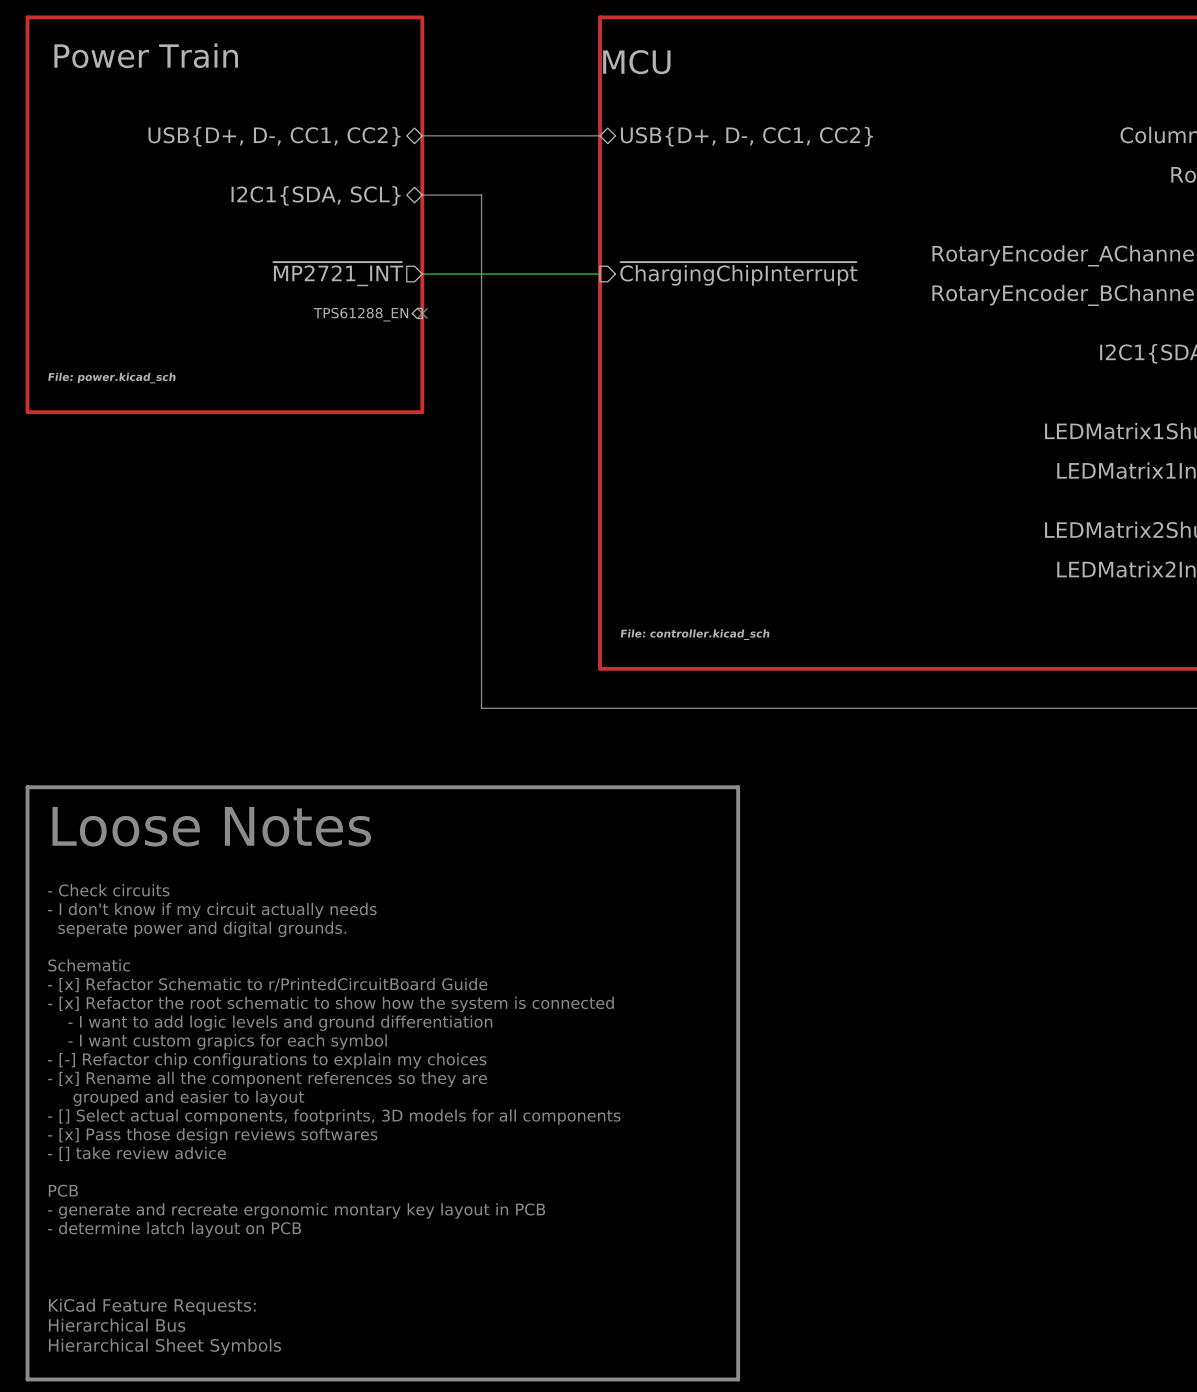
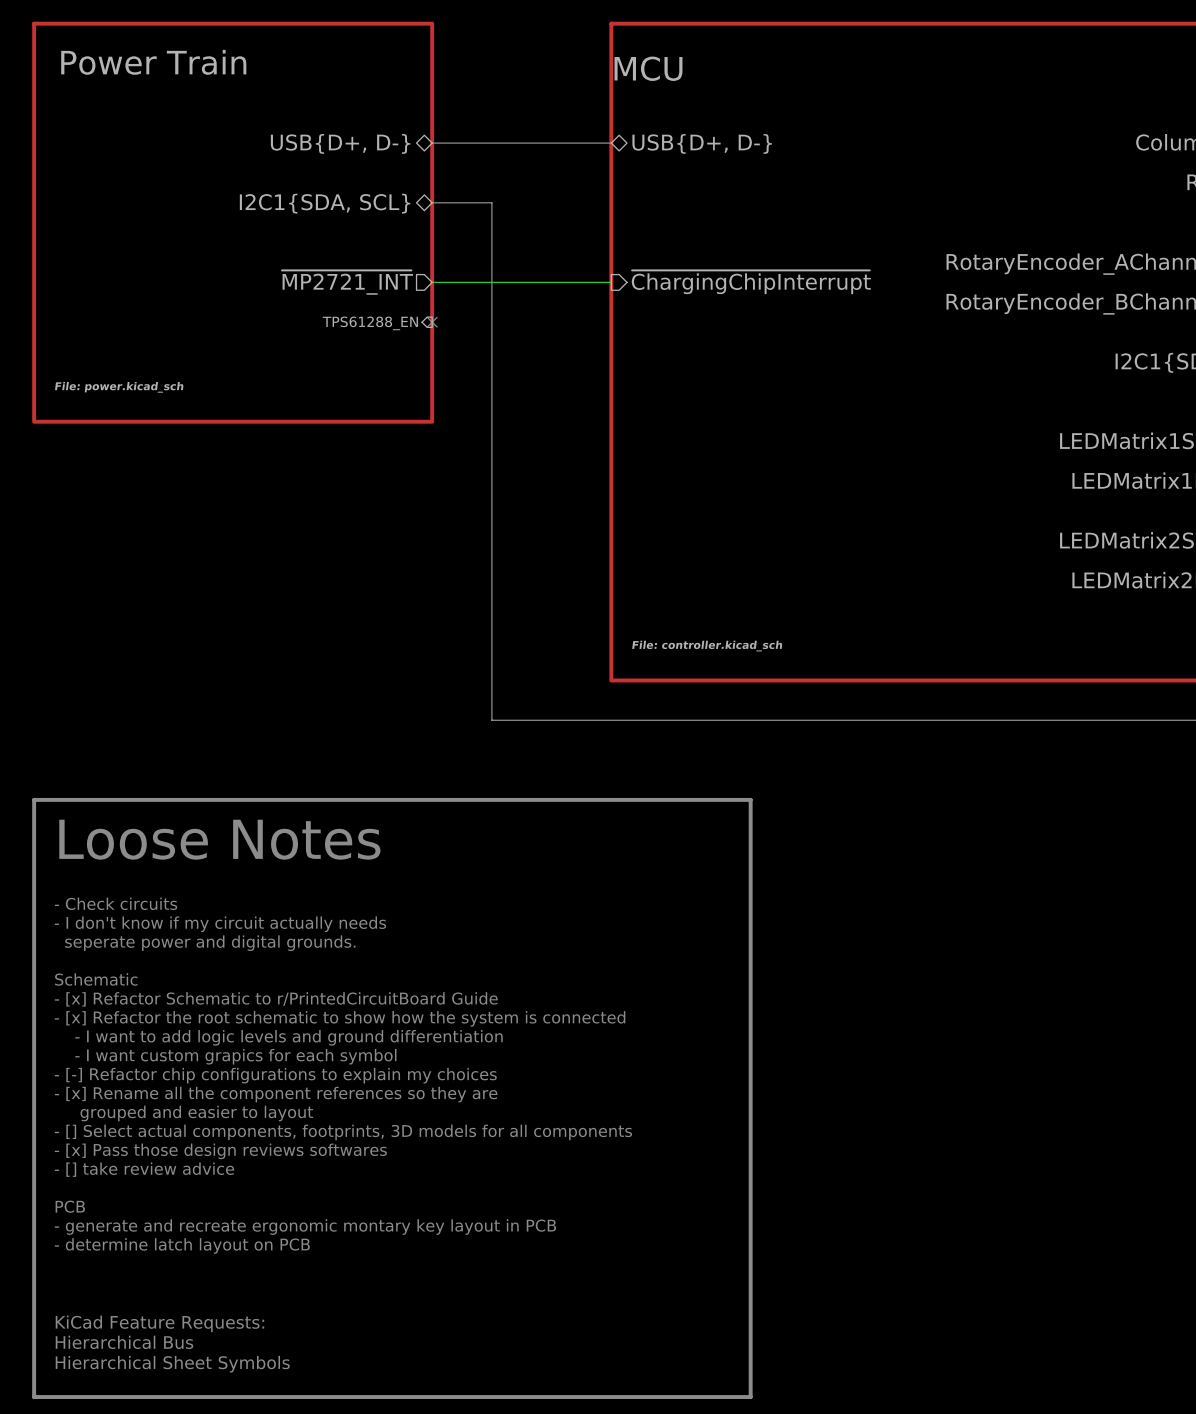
sheet pin: USB{D+, D-, CC1, CC2} (274, 136) -> USB{D+, D-} (340, 143)
sheet pin: USB{D+, D-, CC1, CC2} (746, 136) -> USB{D+, D-} (702, 143)

